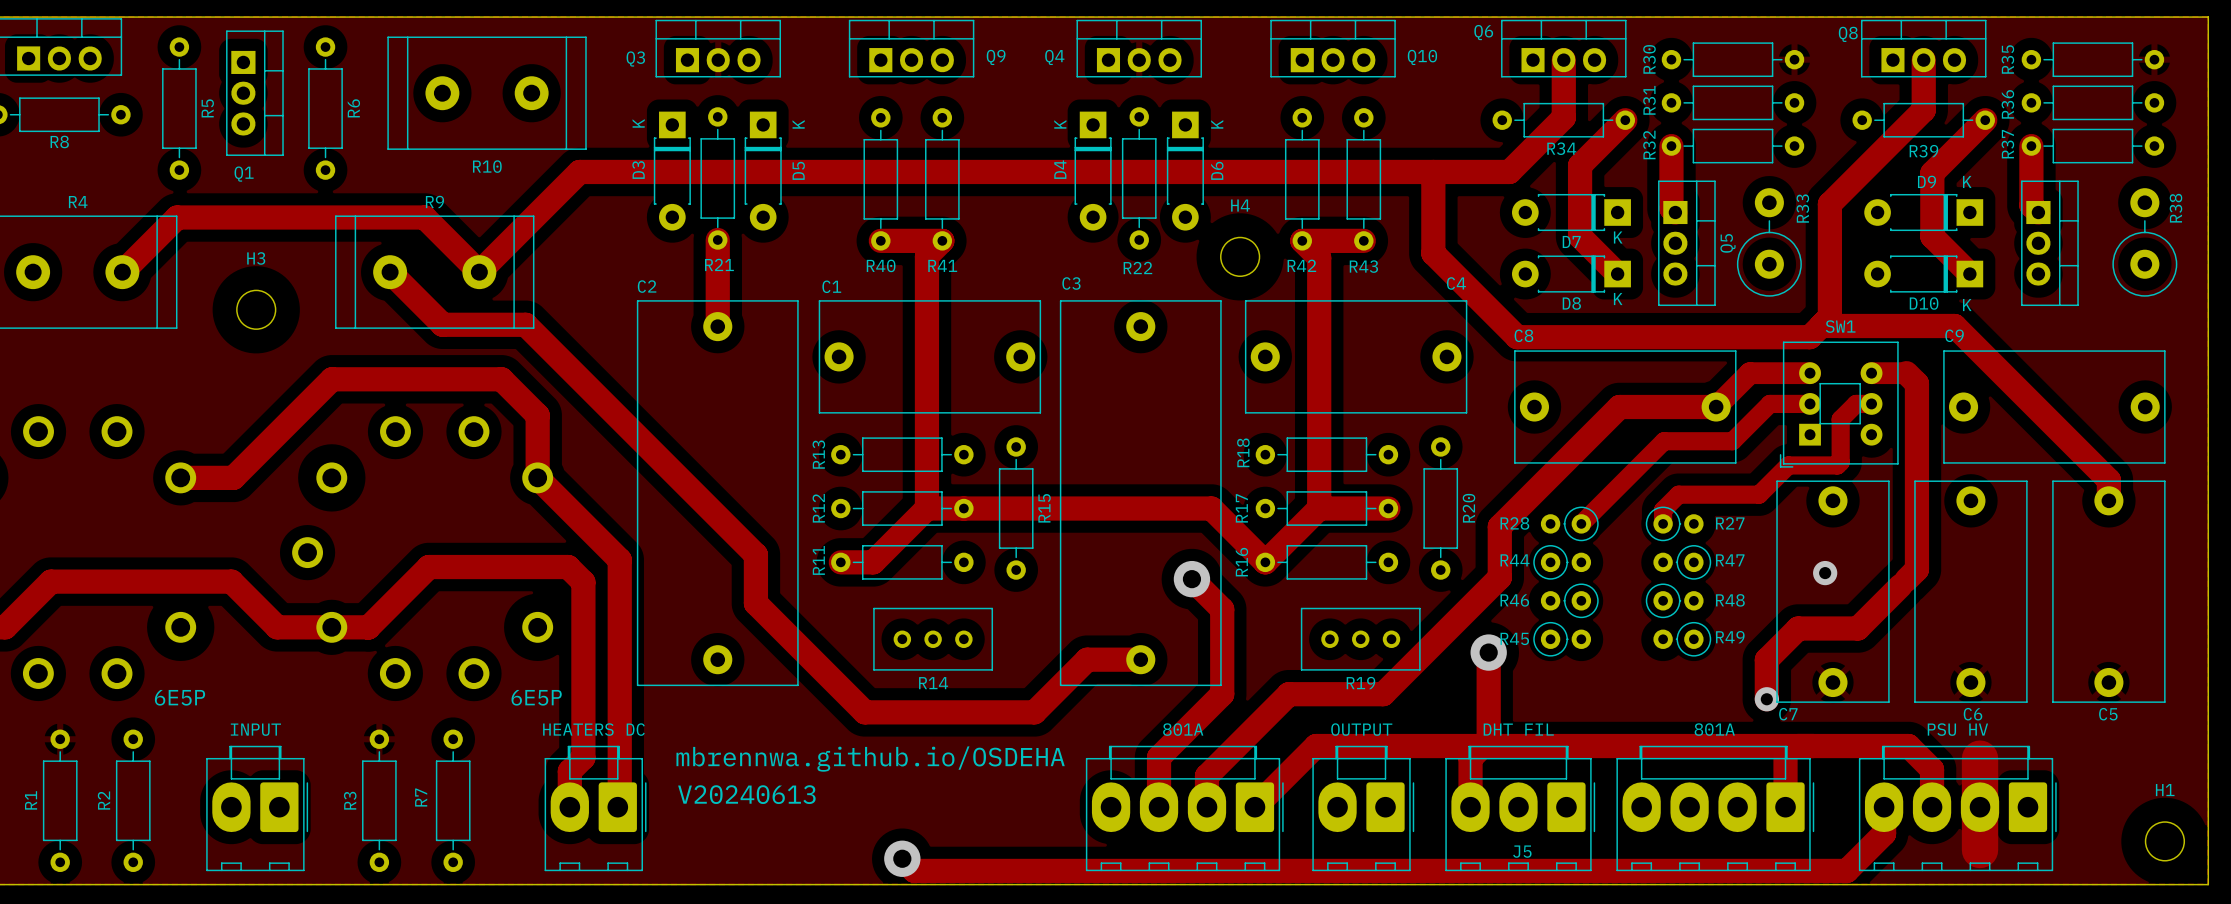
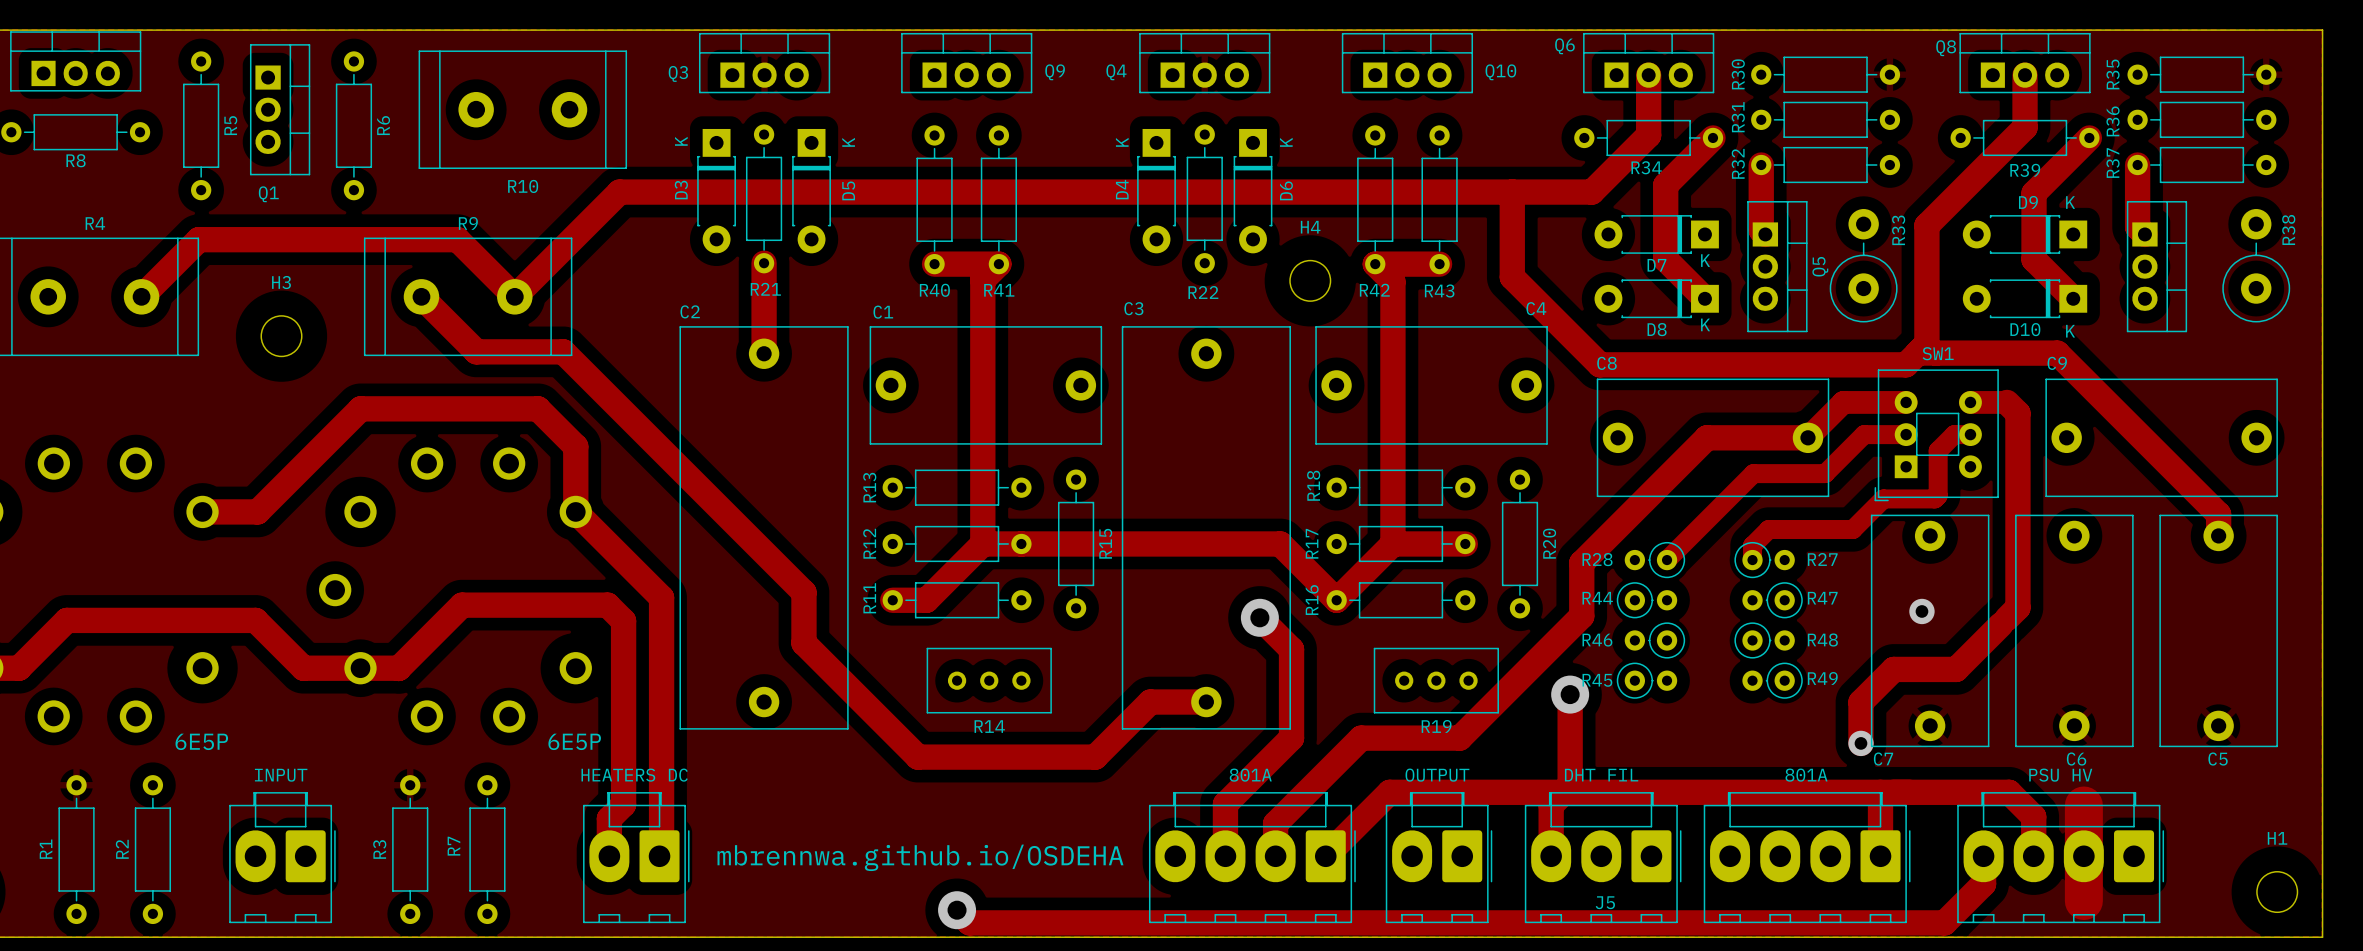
text position: mbrennwa.github.io/OSDEHA (870, 759) -> mbrennwa.github.io/OSDEHA (920, 857)
text: V20240613 (746, 794) -> none

